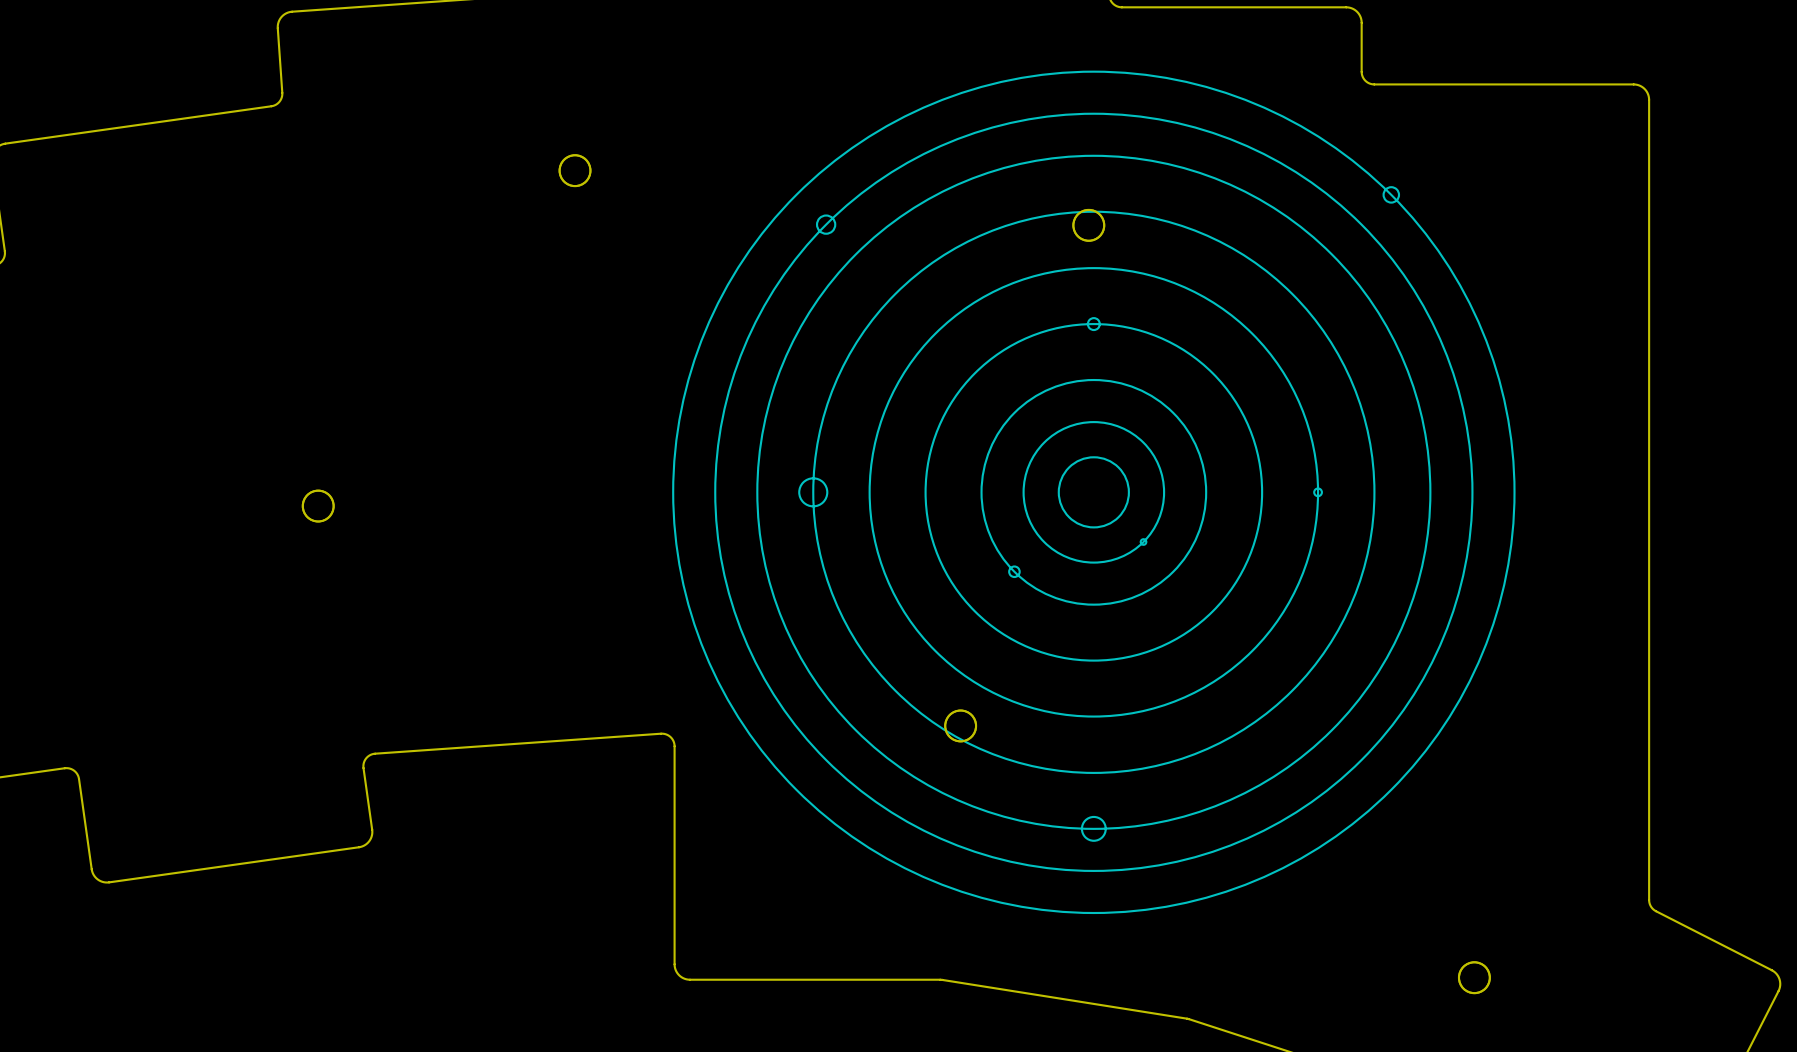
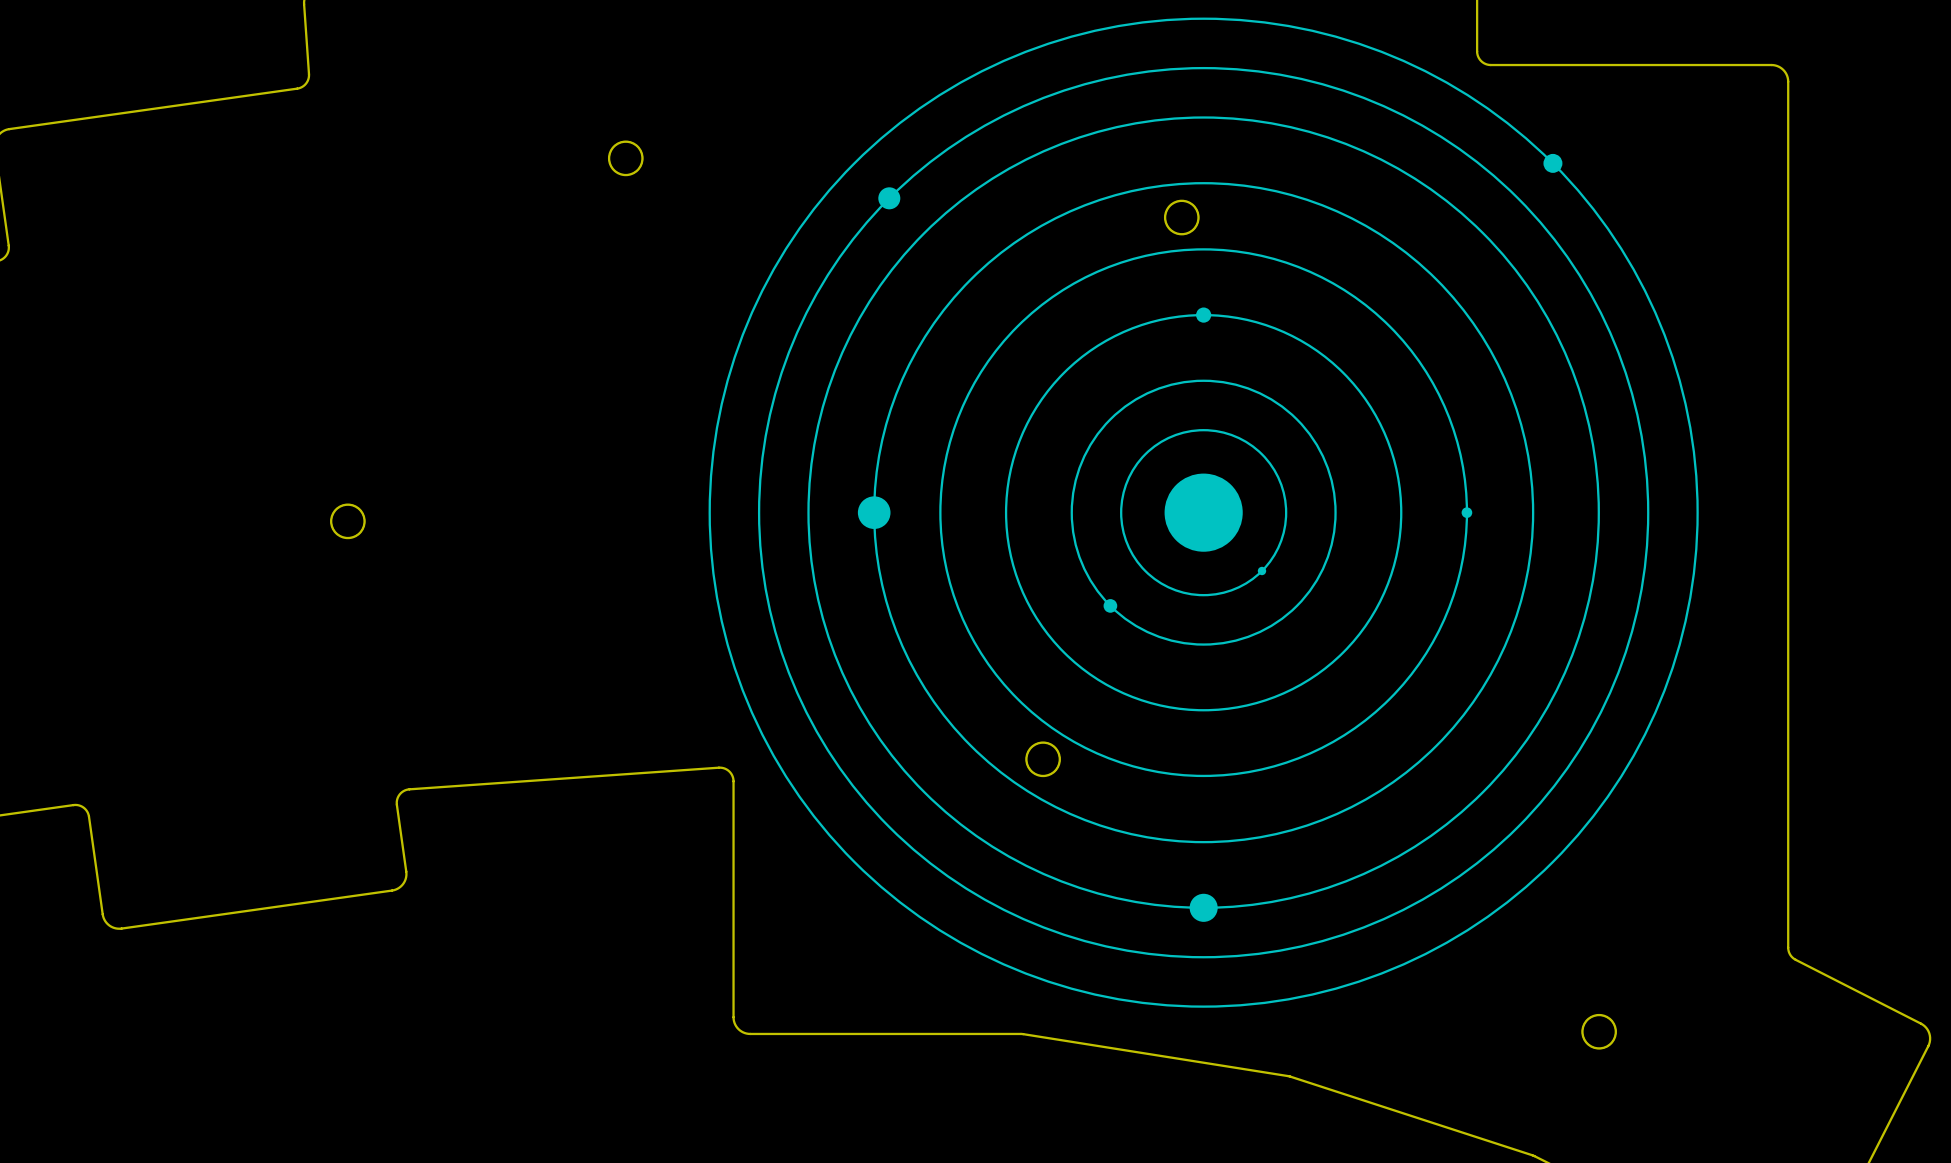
drawing: none -> [708, 17, 1699, 1008]
drawing: [672, 70, 1516, 915] -> none

